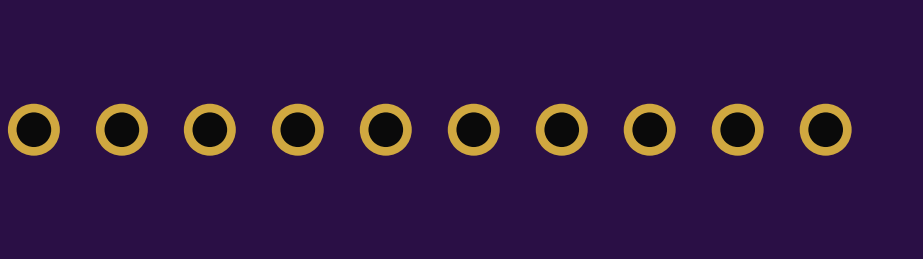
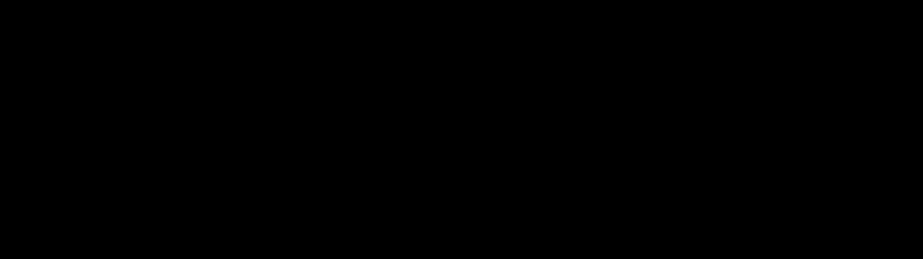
via: (33, 129) -> none
via: (121, 129) -> none
via: (209, 129) -> none
via: (297, 129) -> none
via: (385, 129) -> none
via: (473, 129) -> none
via: (561, 129) -> none
via: (649, 129) -> none
via: (737, 129) -> none
via: (825, 129) -> none

